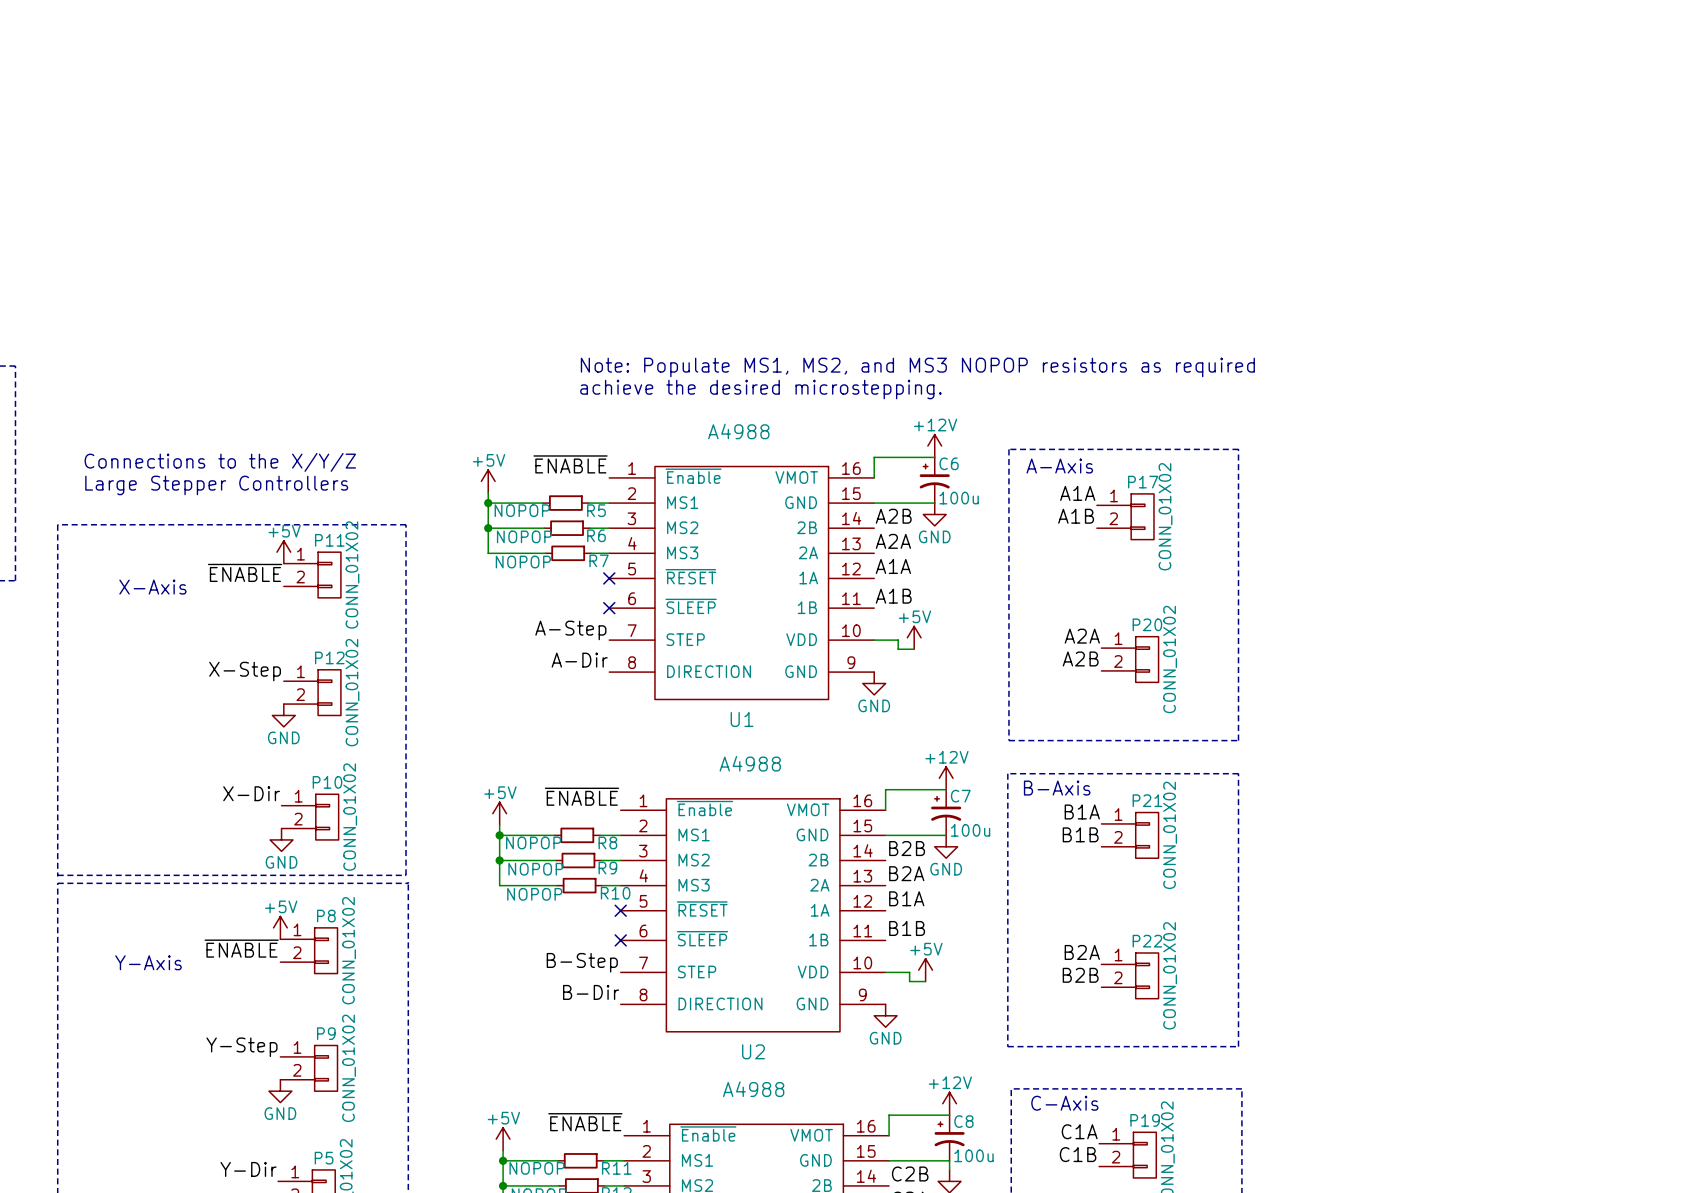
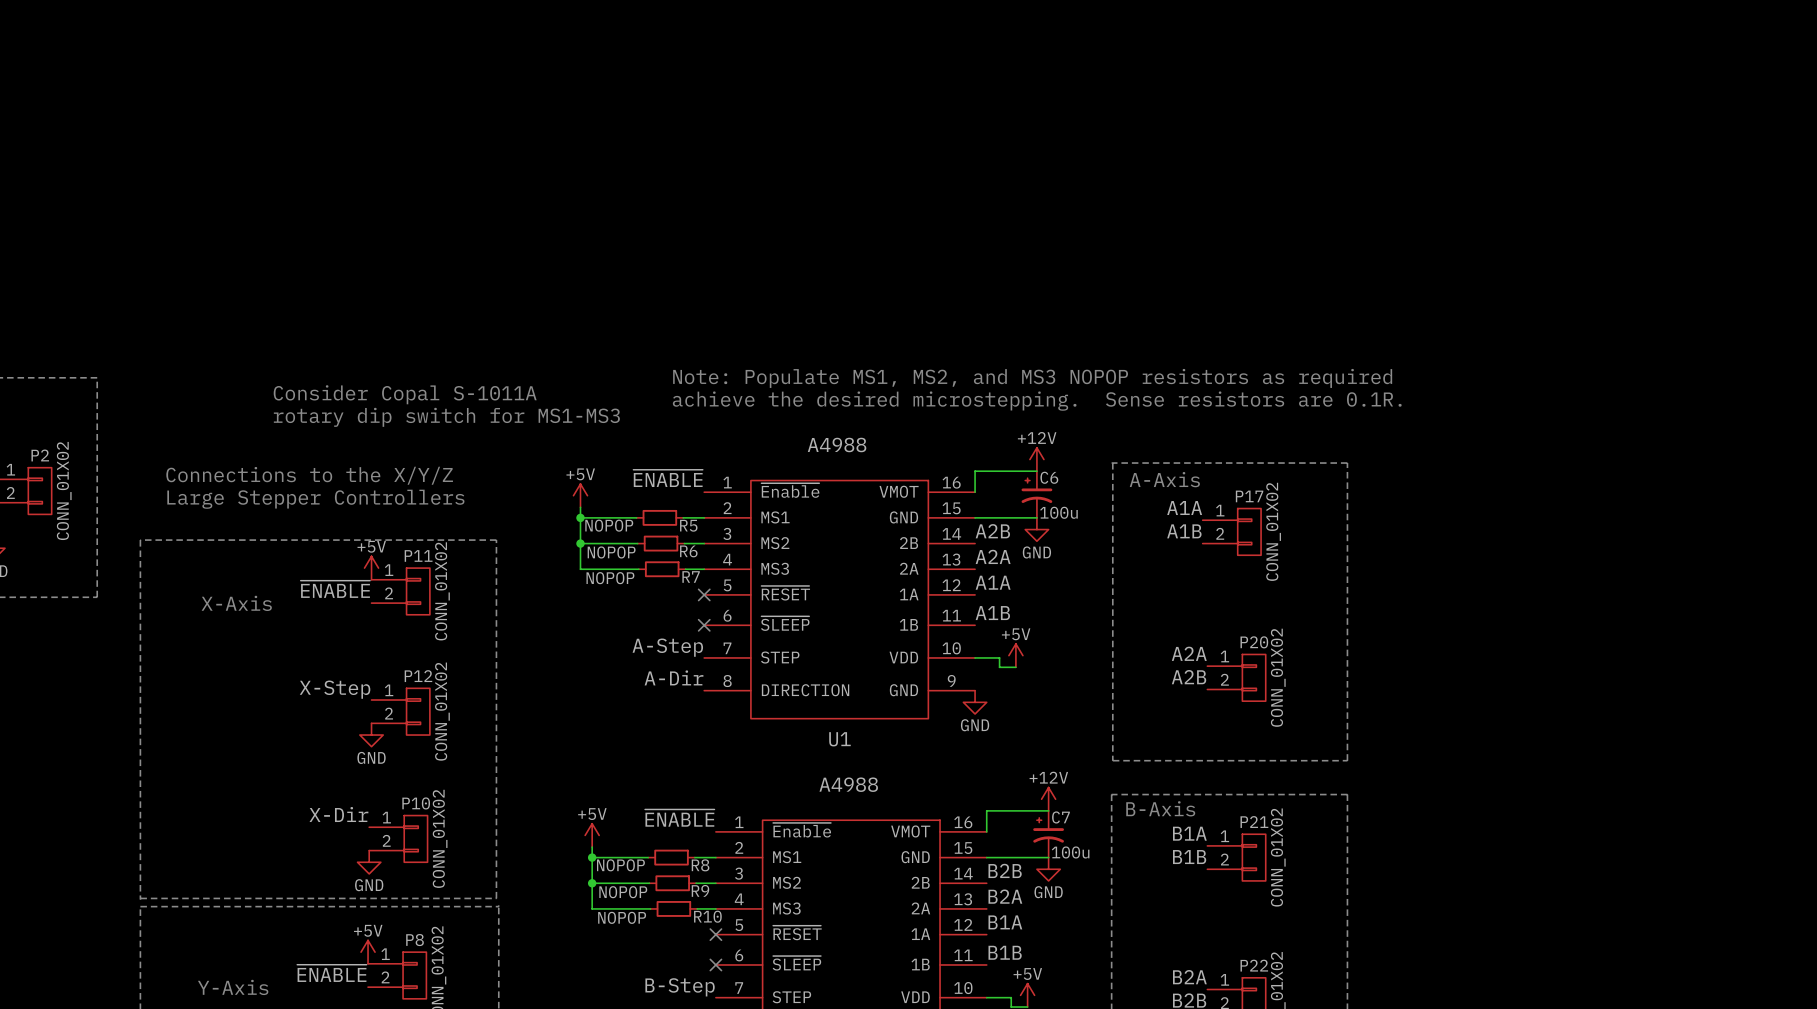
text: none -> Consider Copal S-1011A (405, 394)
text: achieve the desired microstepping. (760, 389) -> achieve the desired microstepping. Sense resistors are 0.1R. (1037, 401)
text: none -> rotary dip switch for MS1-MS3 (446, 417)

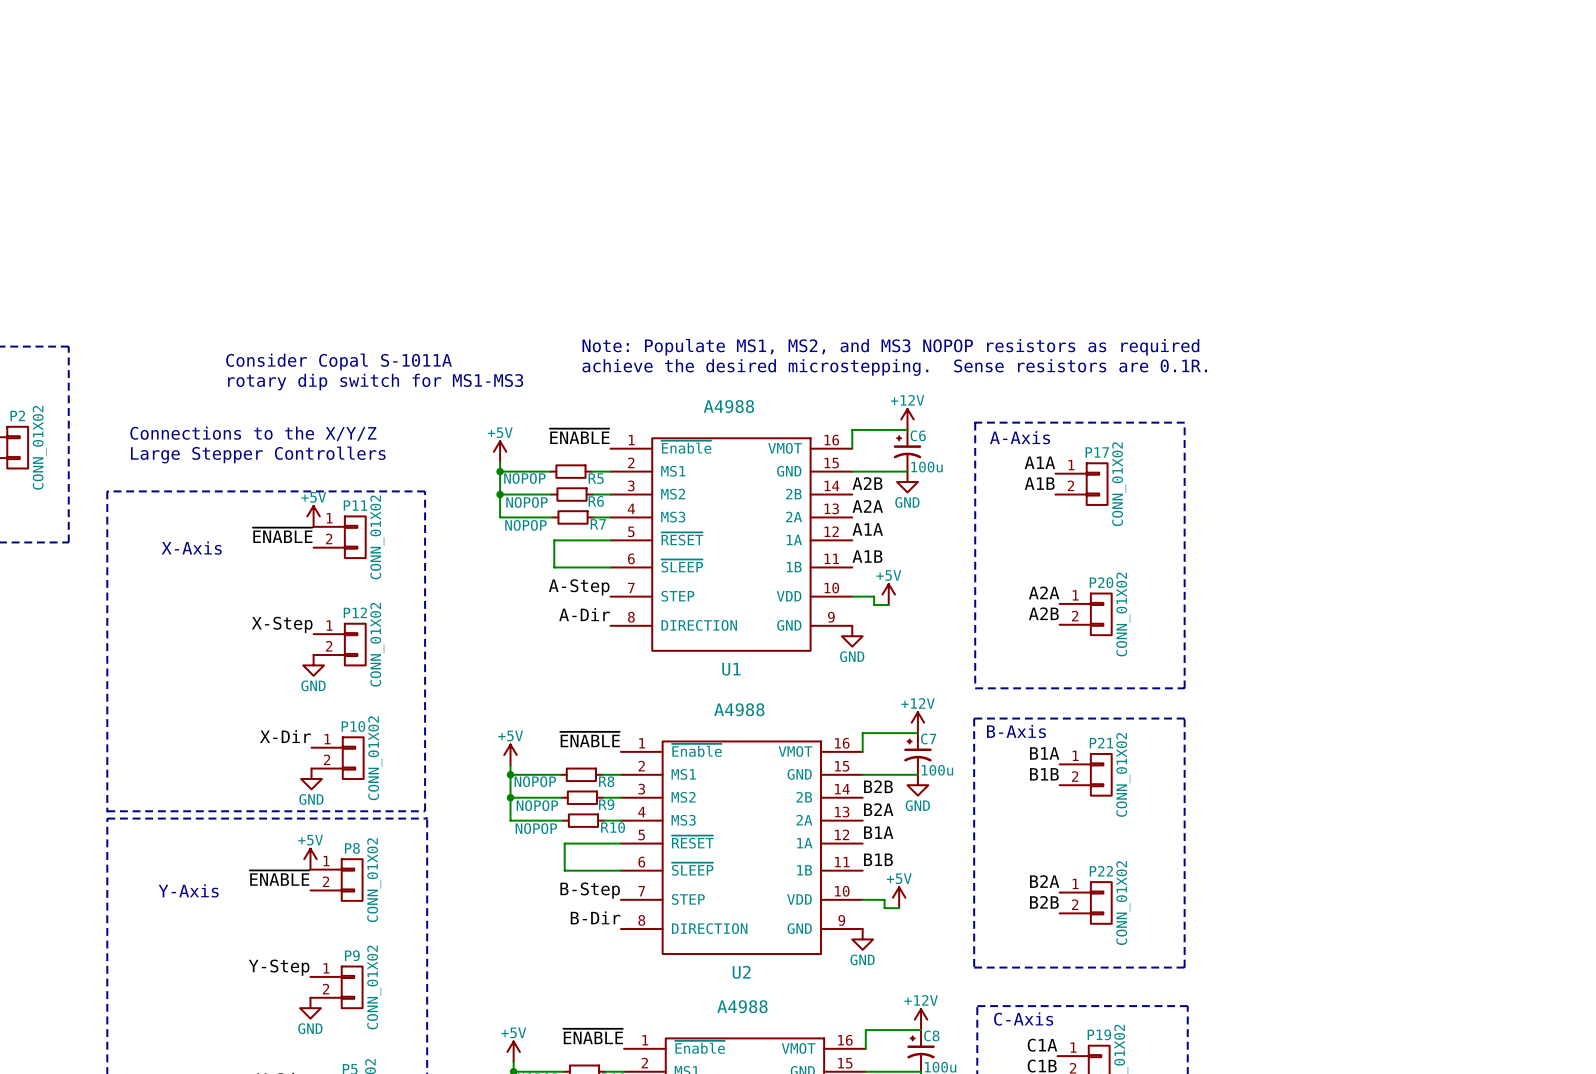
wire: none -> (610, 540) (554, 540) (554, 567) (610, 567)
no-connect mark: (704, 594) -> none
no-connect mark: (704, 625) -> none
wire: none -> (620, 843) (564, 843) (564, 870) (620, 870)
no-connect mark: (715, 934) -> none
no-connect mark: (715, 964) -> none

